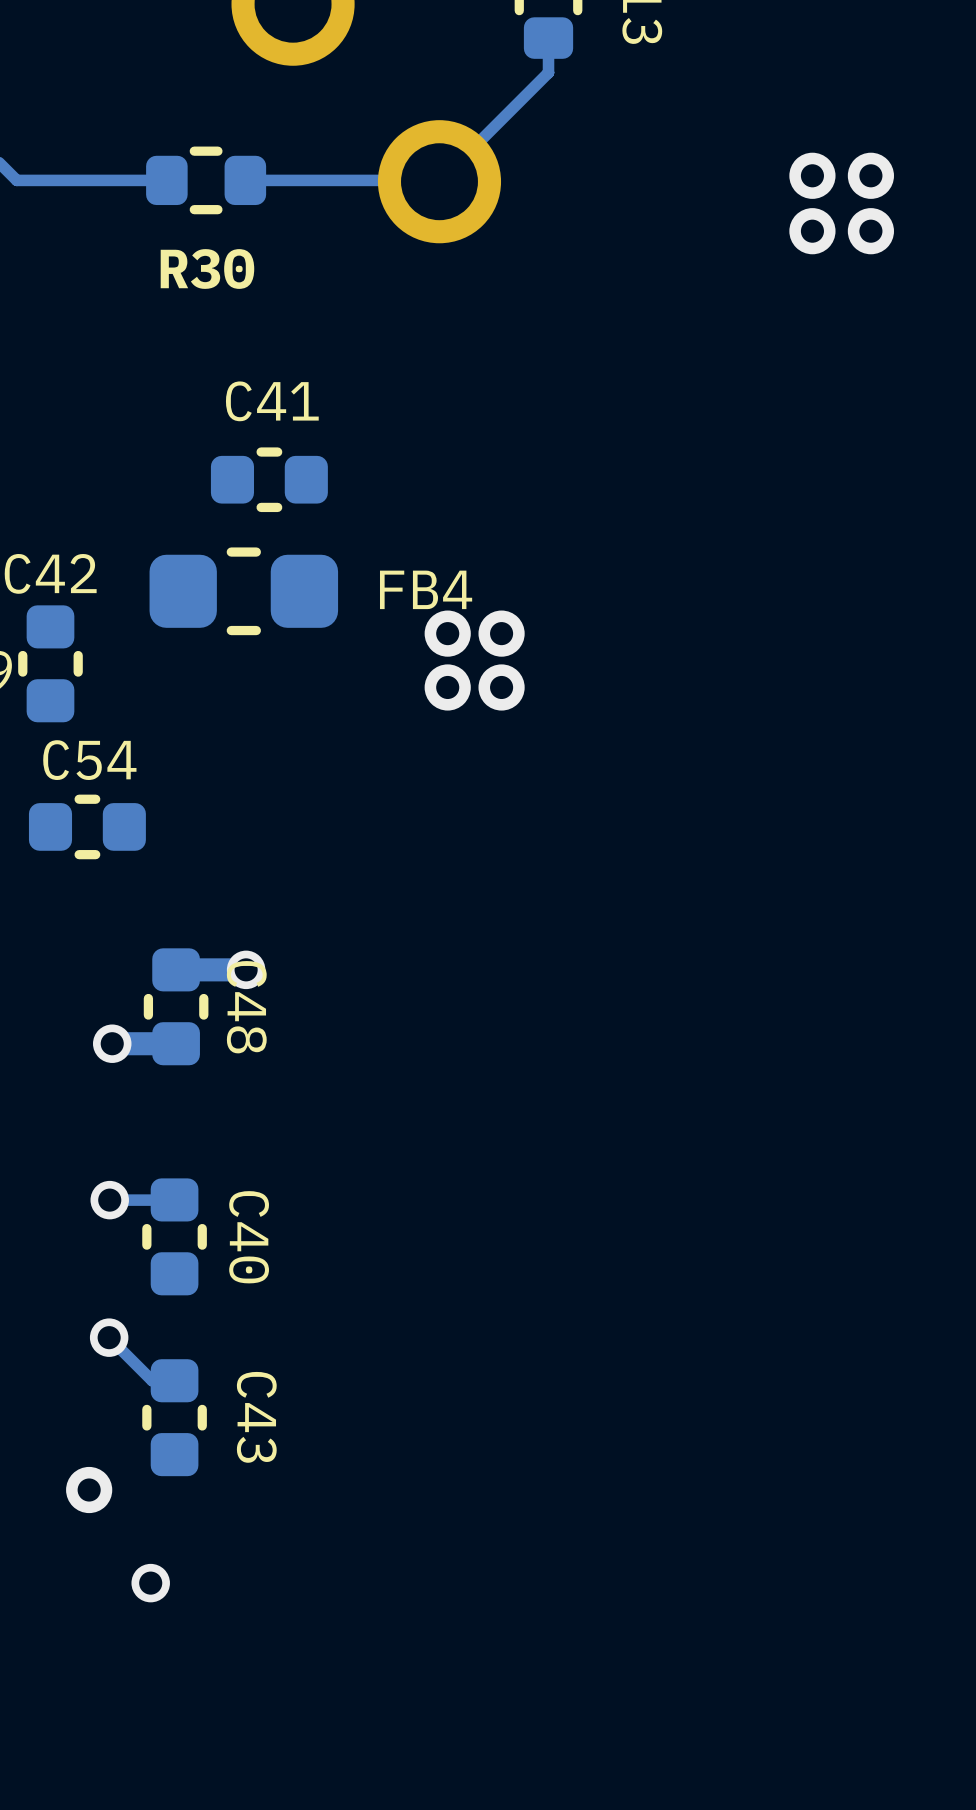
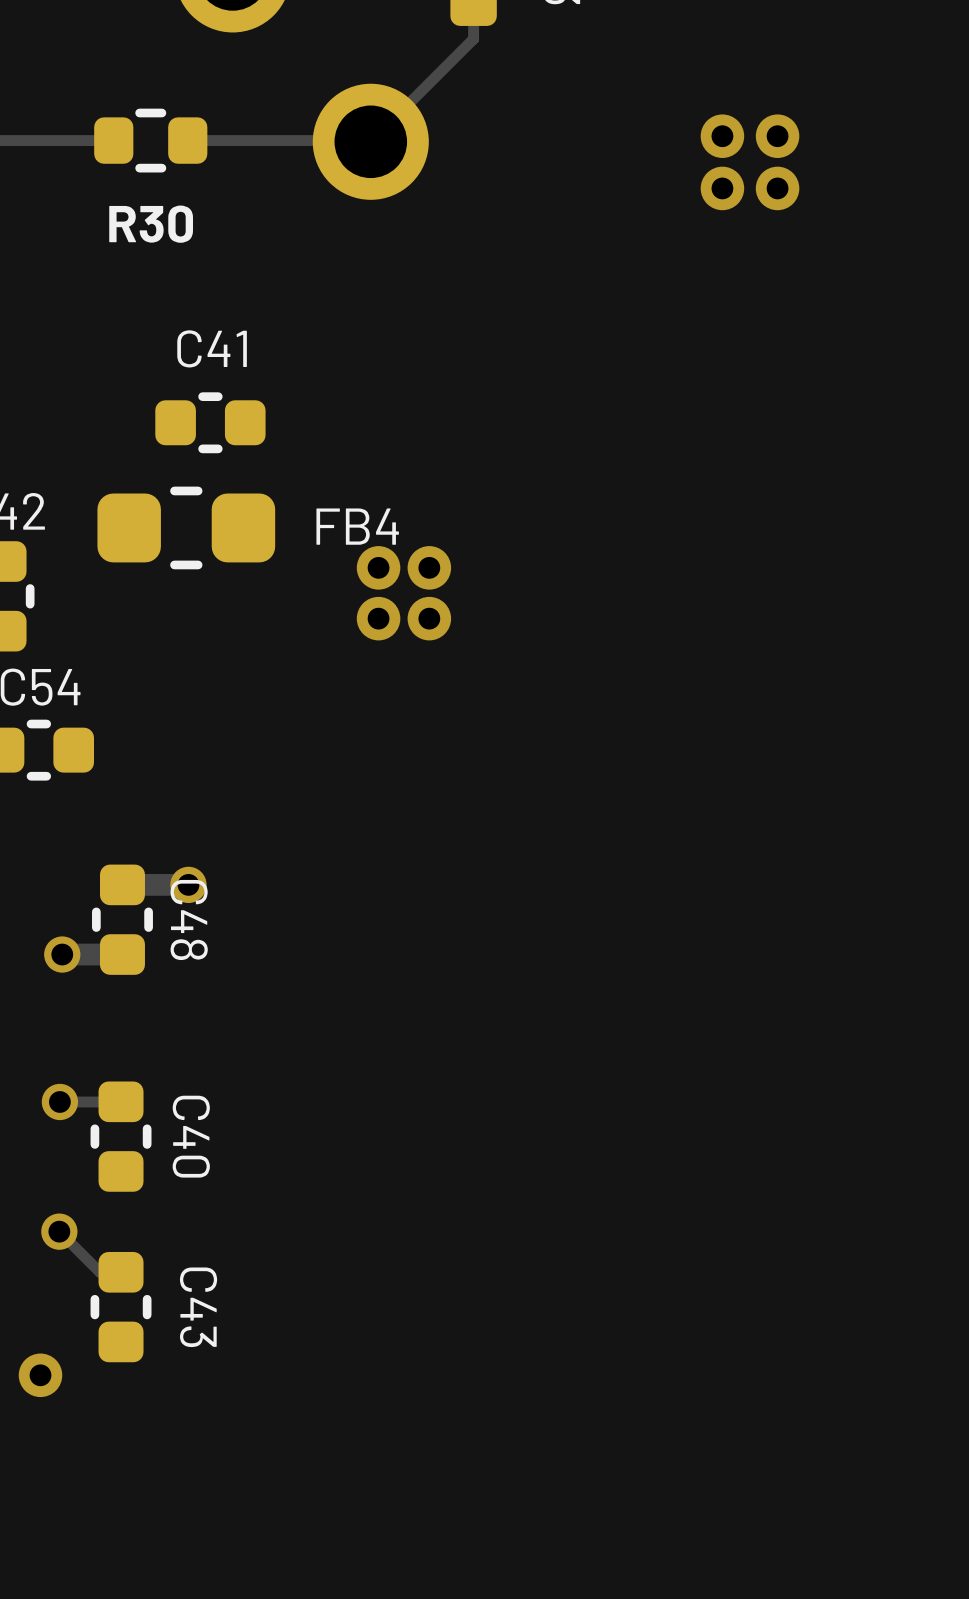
via: (150, 1583) -> none

